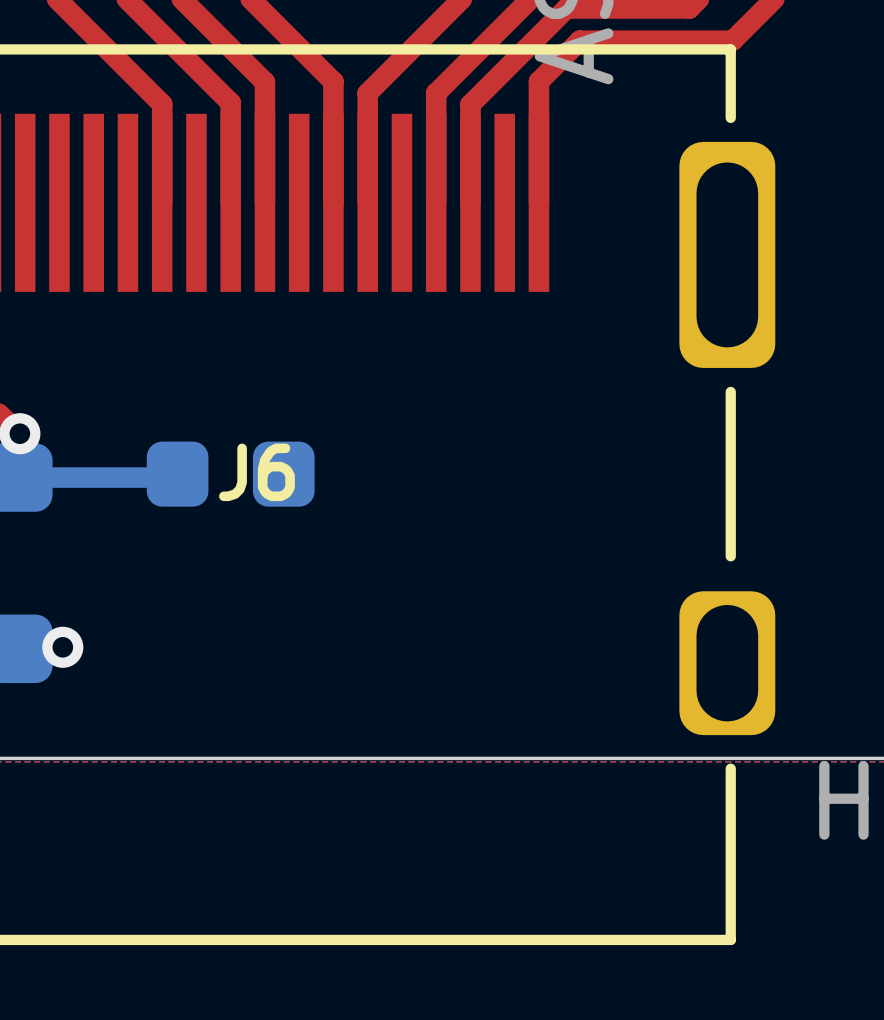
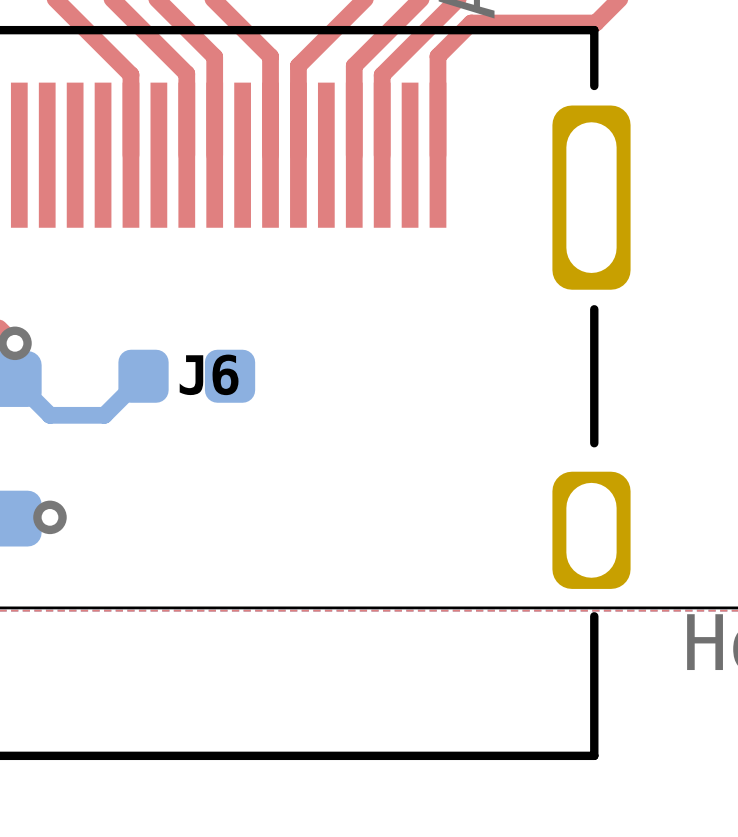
bottom track: (18, 477) (174, 477) -> (14, 343) (13, 379) (50, 415) (104, 415) (140, 379)

